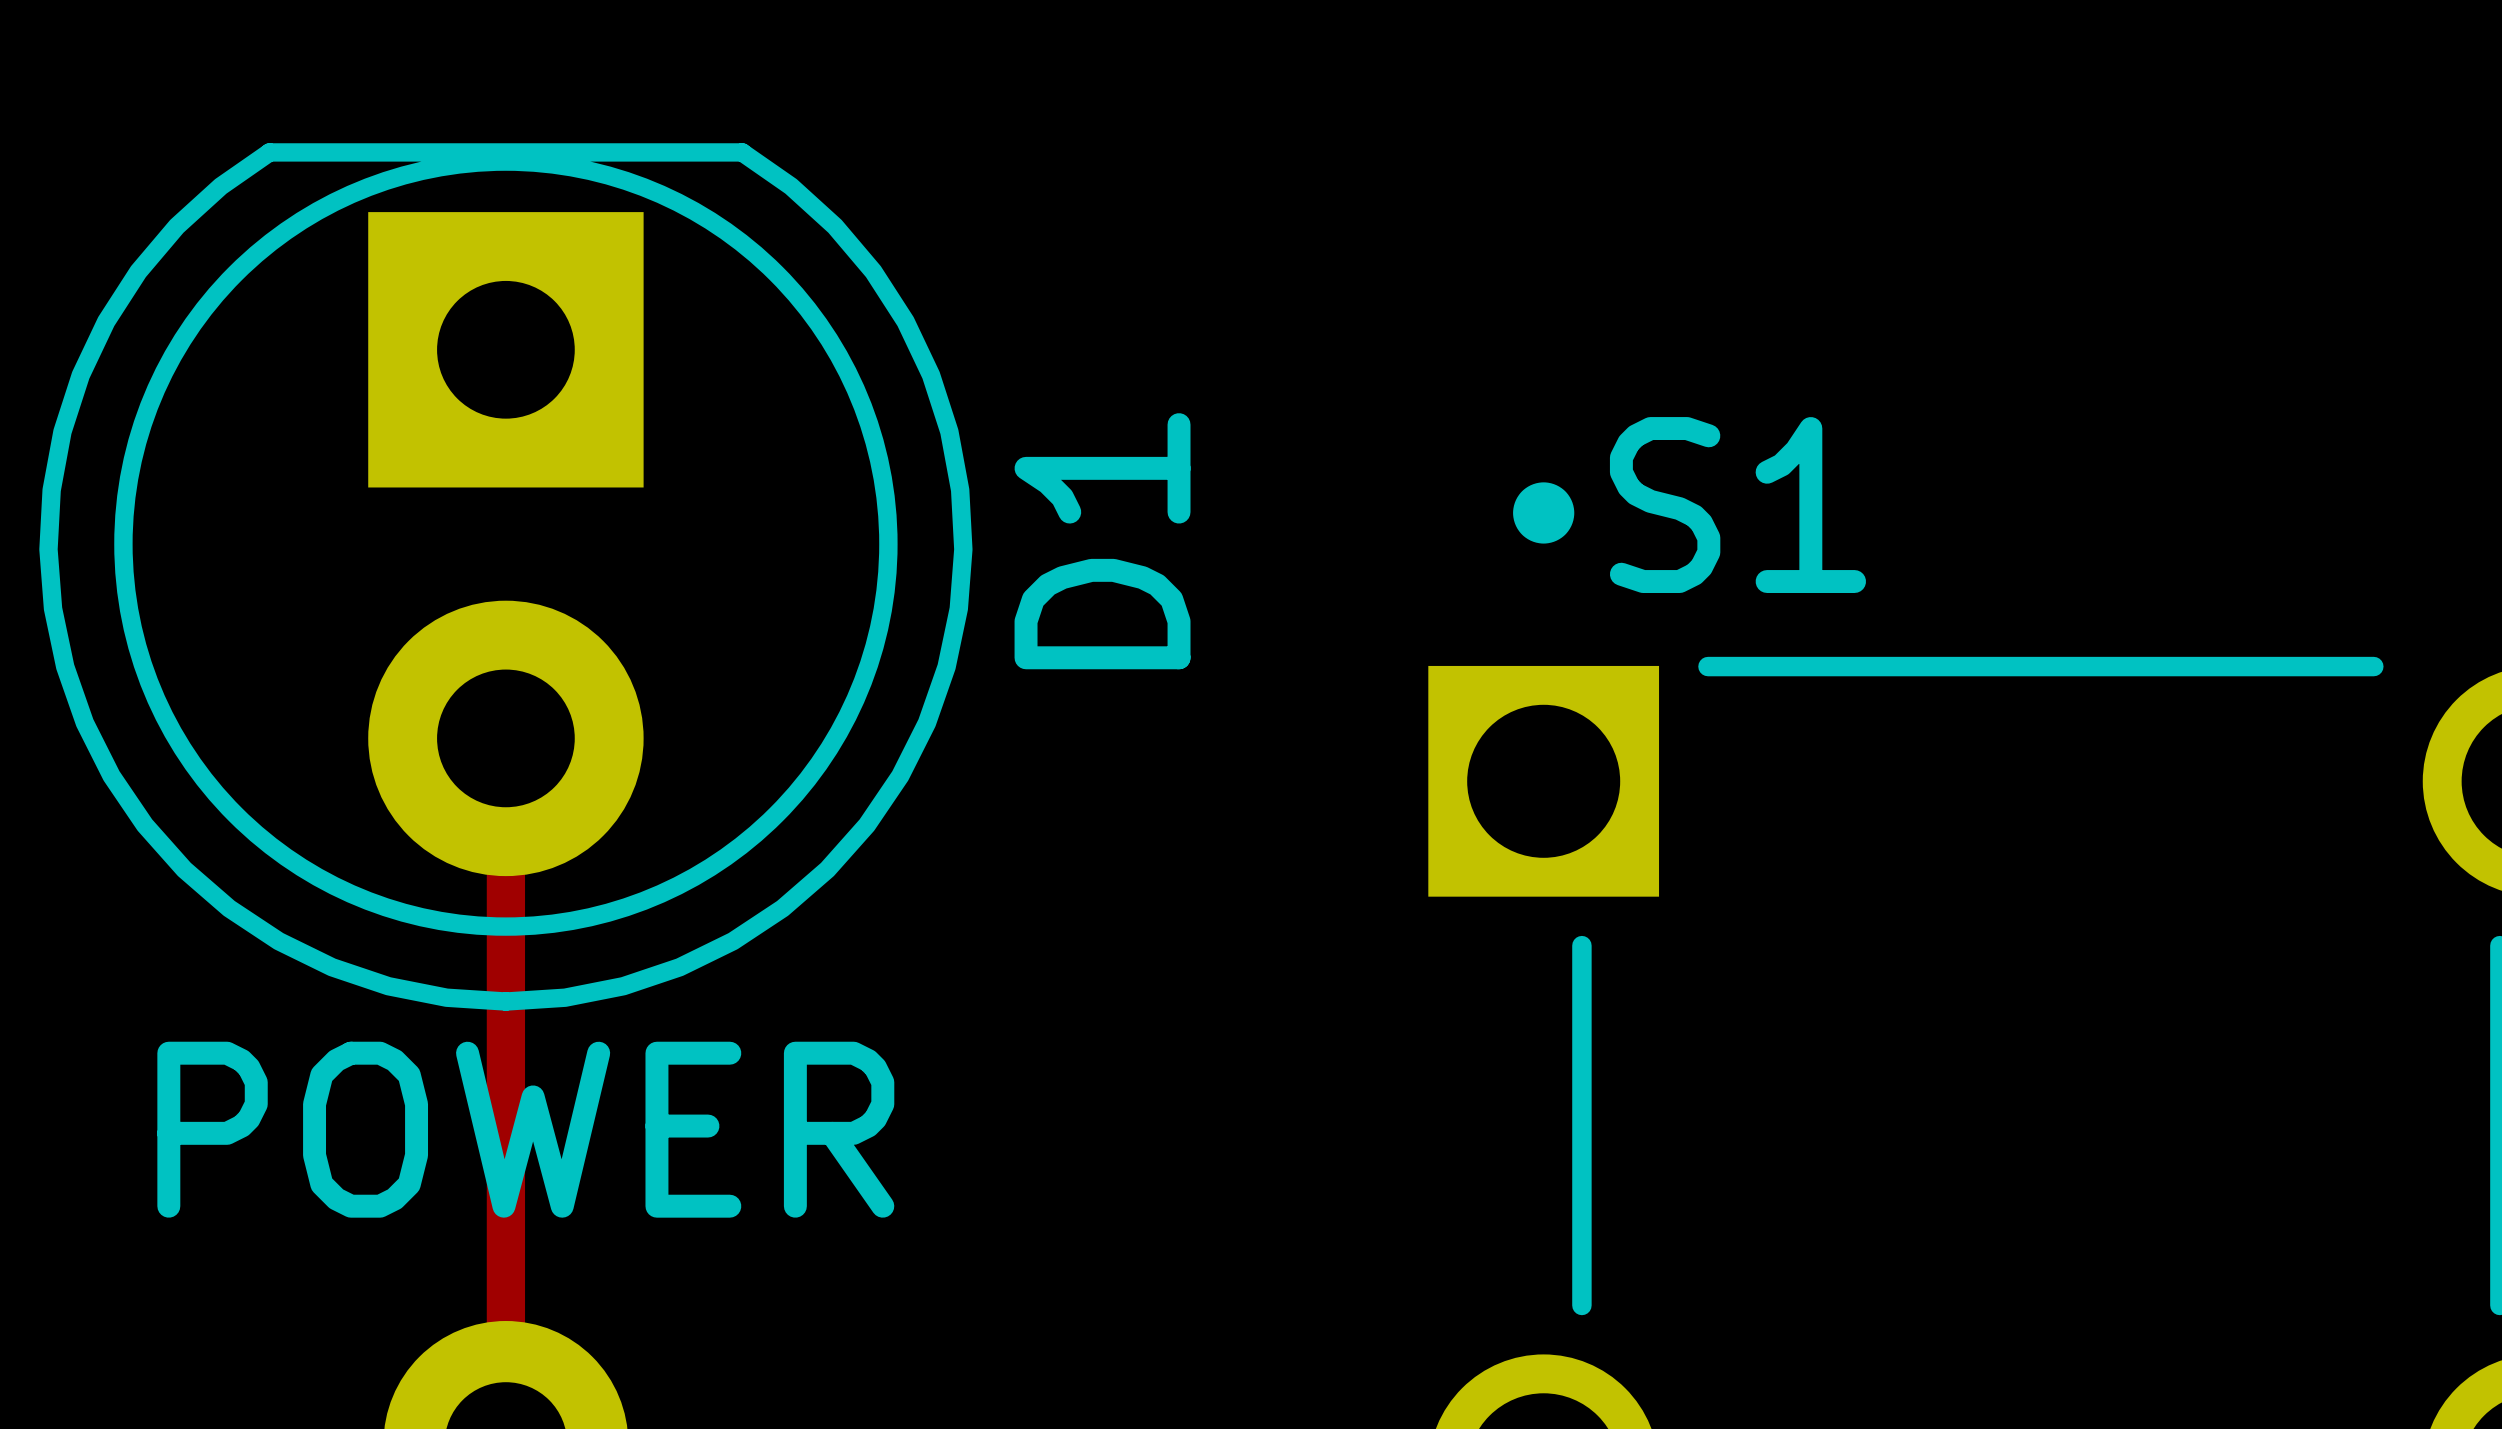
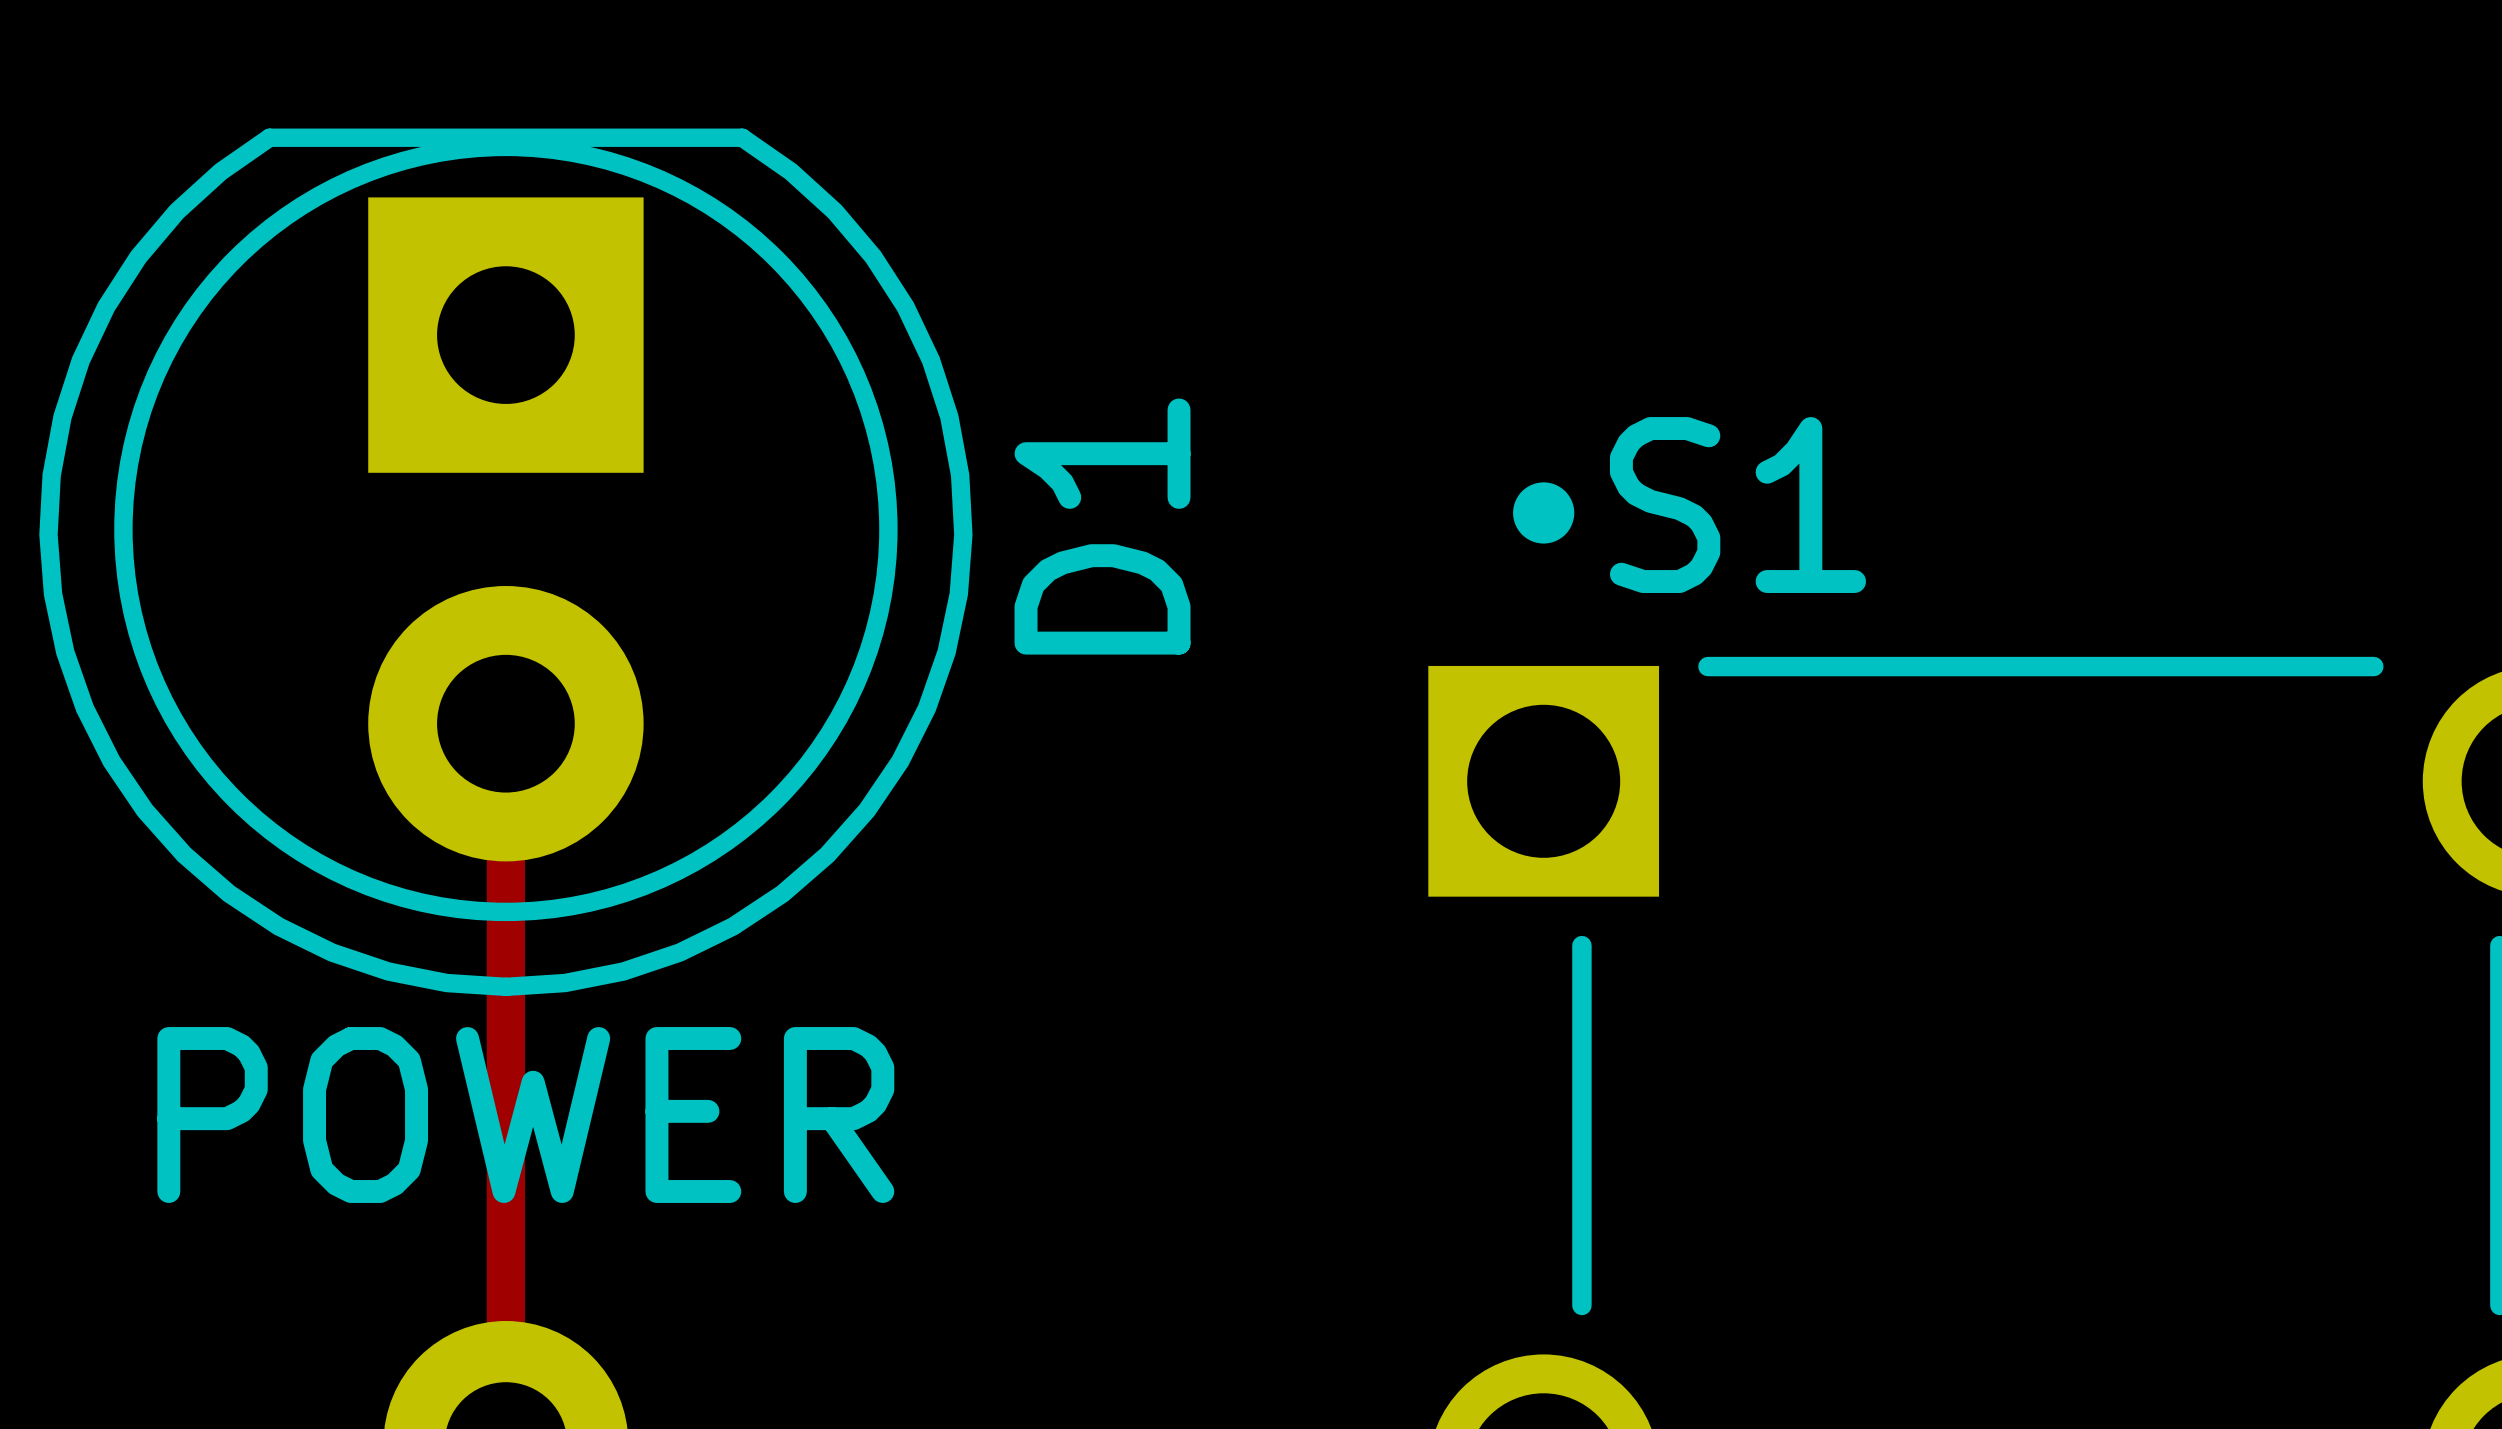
D1 position: (505, 576) -> (505, 562)
text position: POWER (525, 1129) -> POWER (525, 1115)

